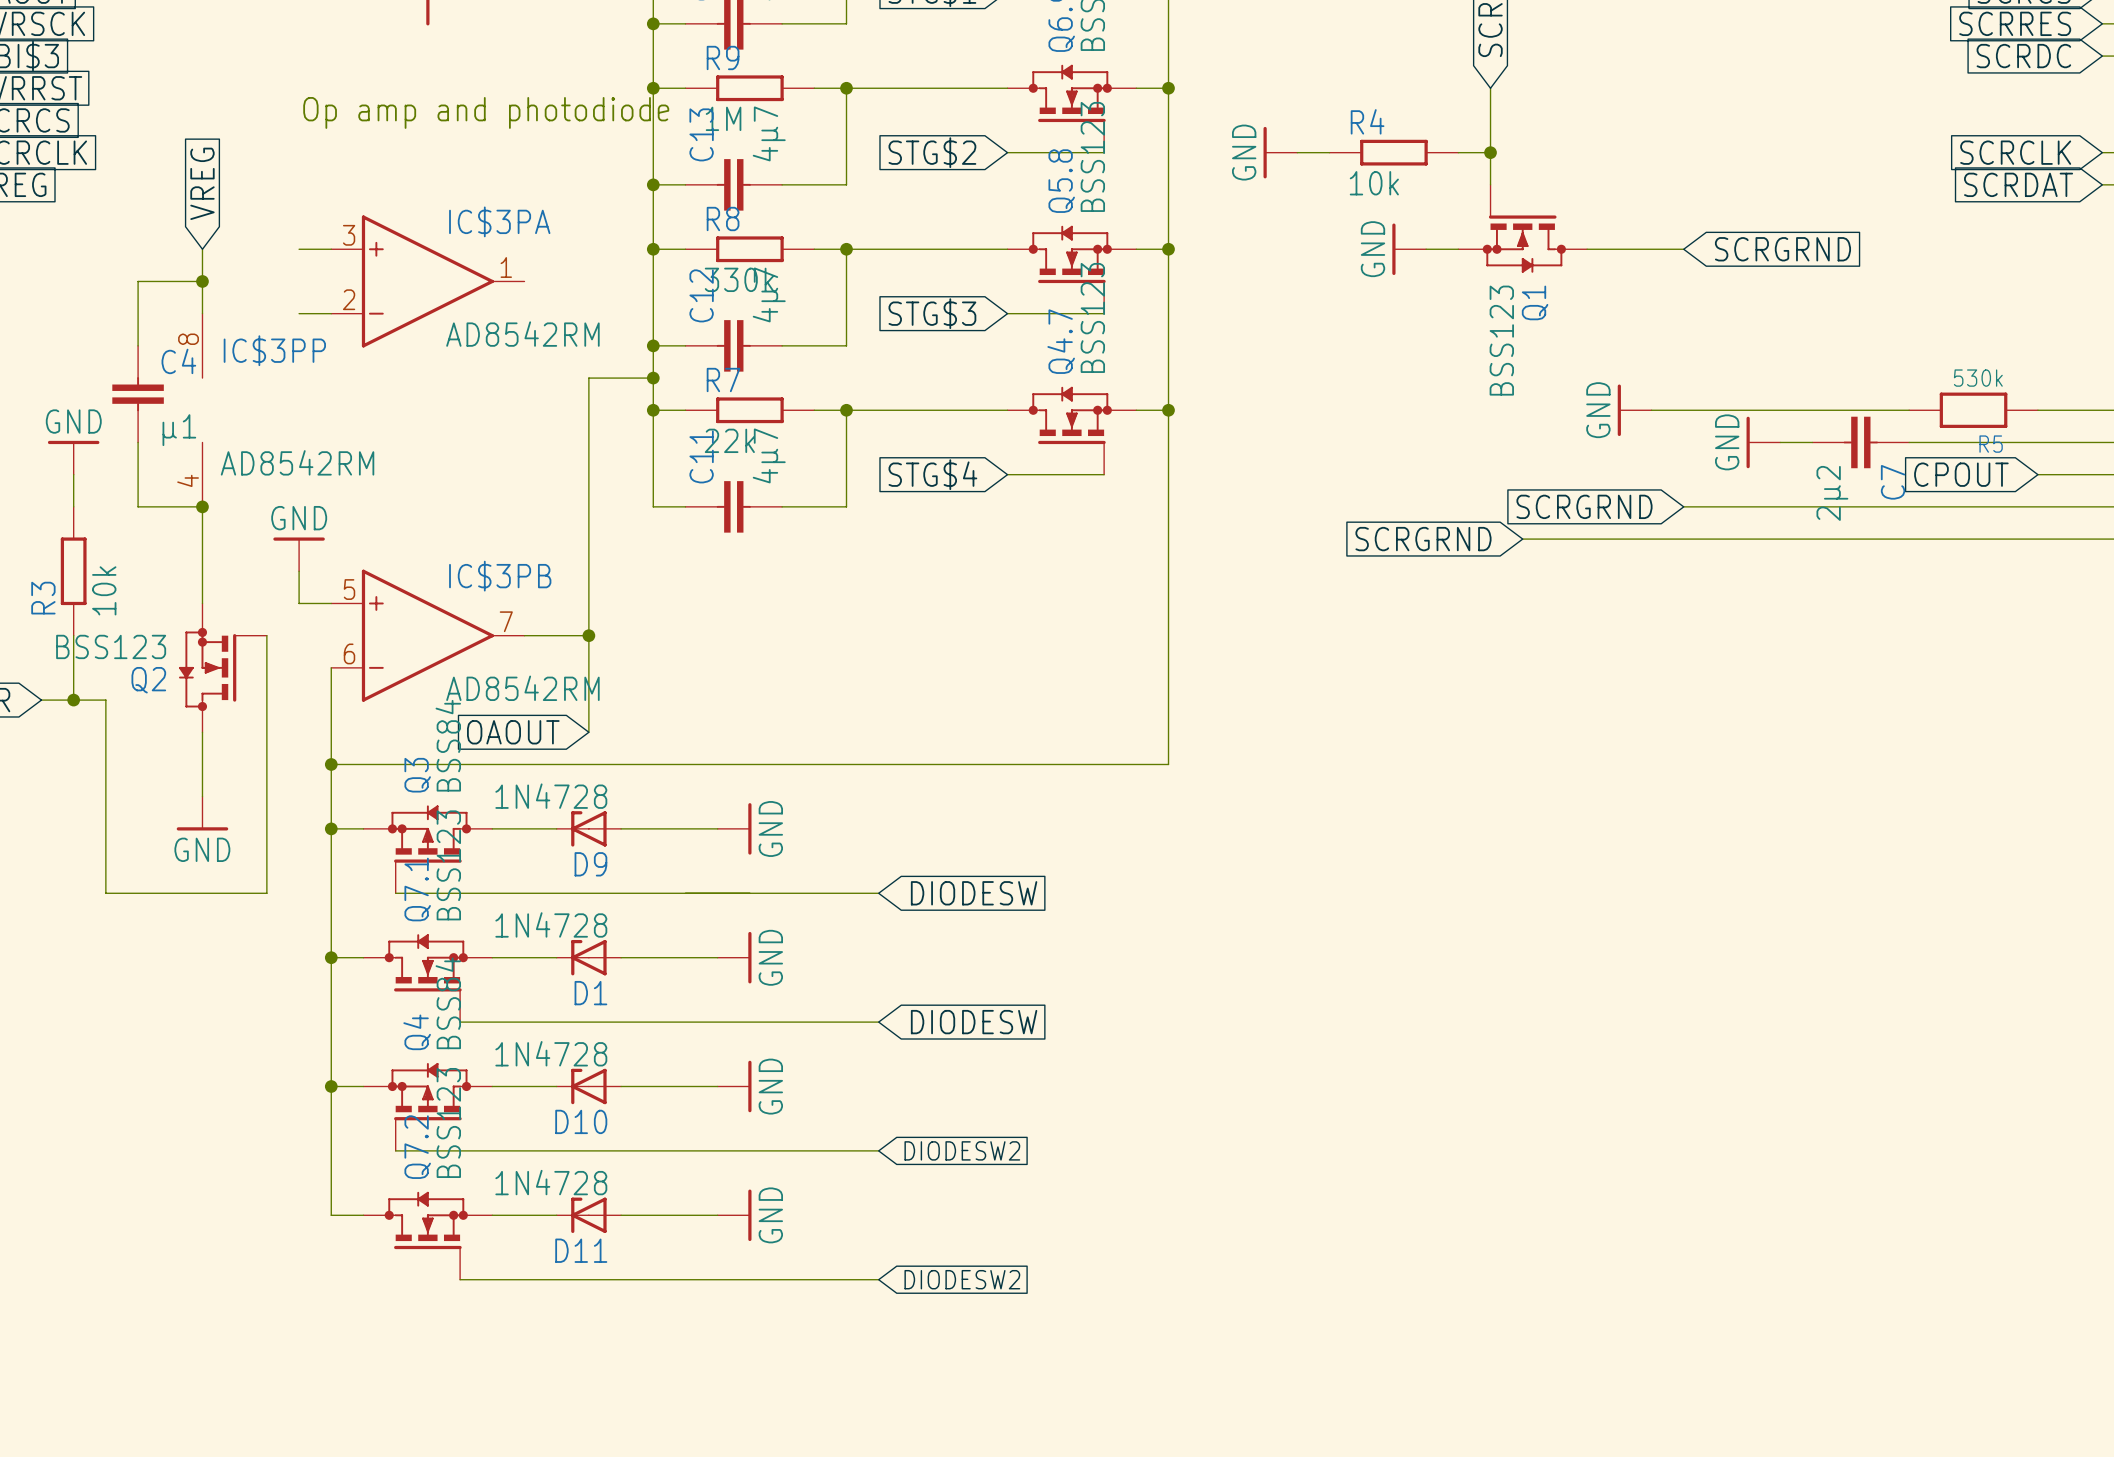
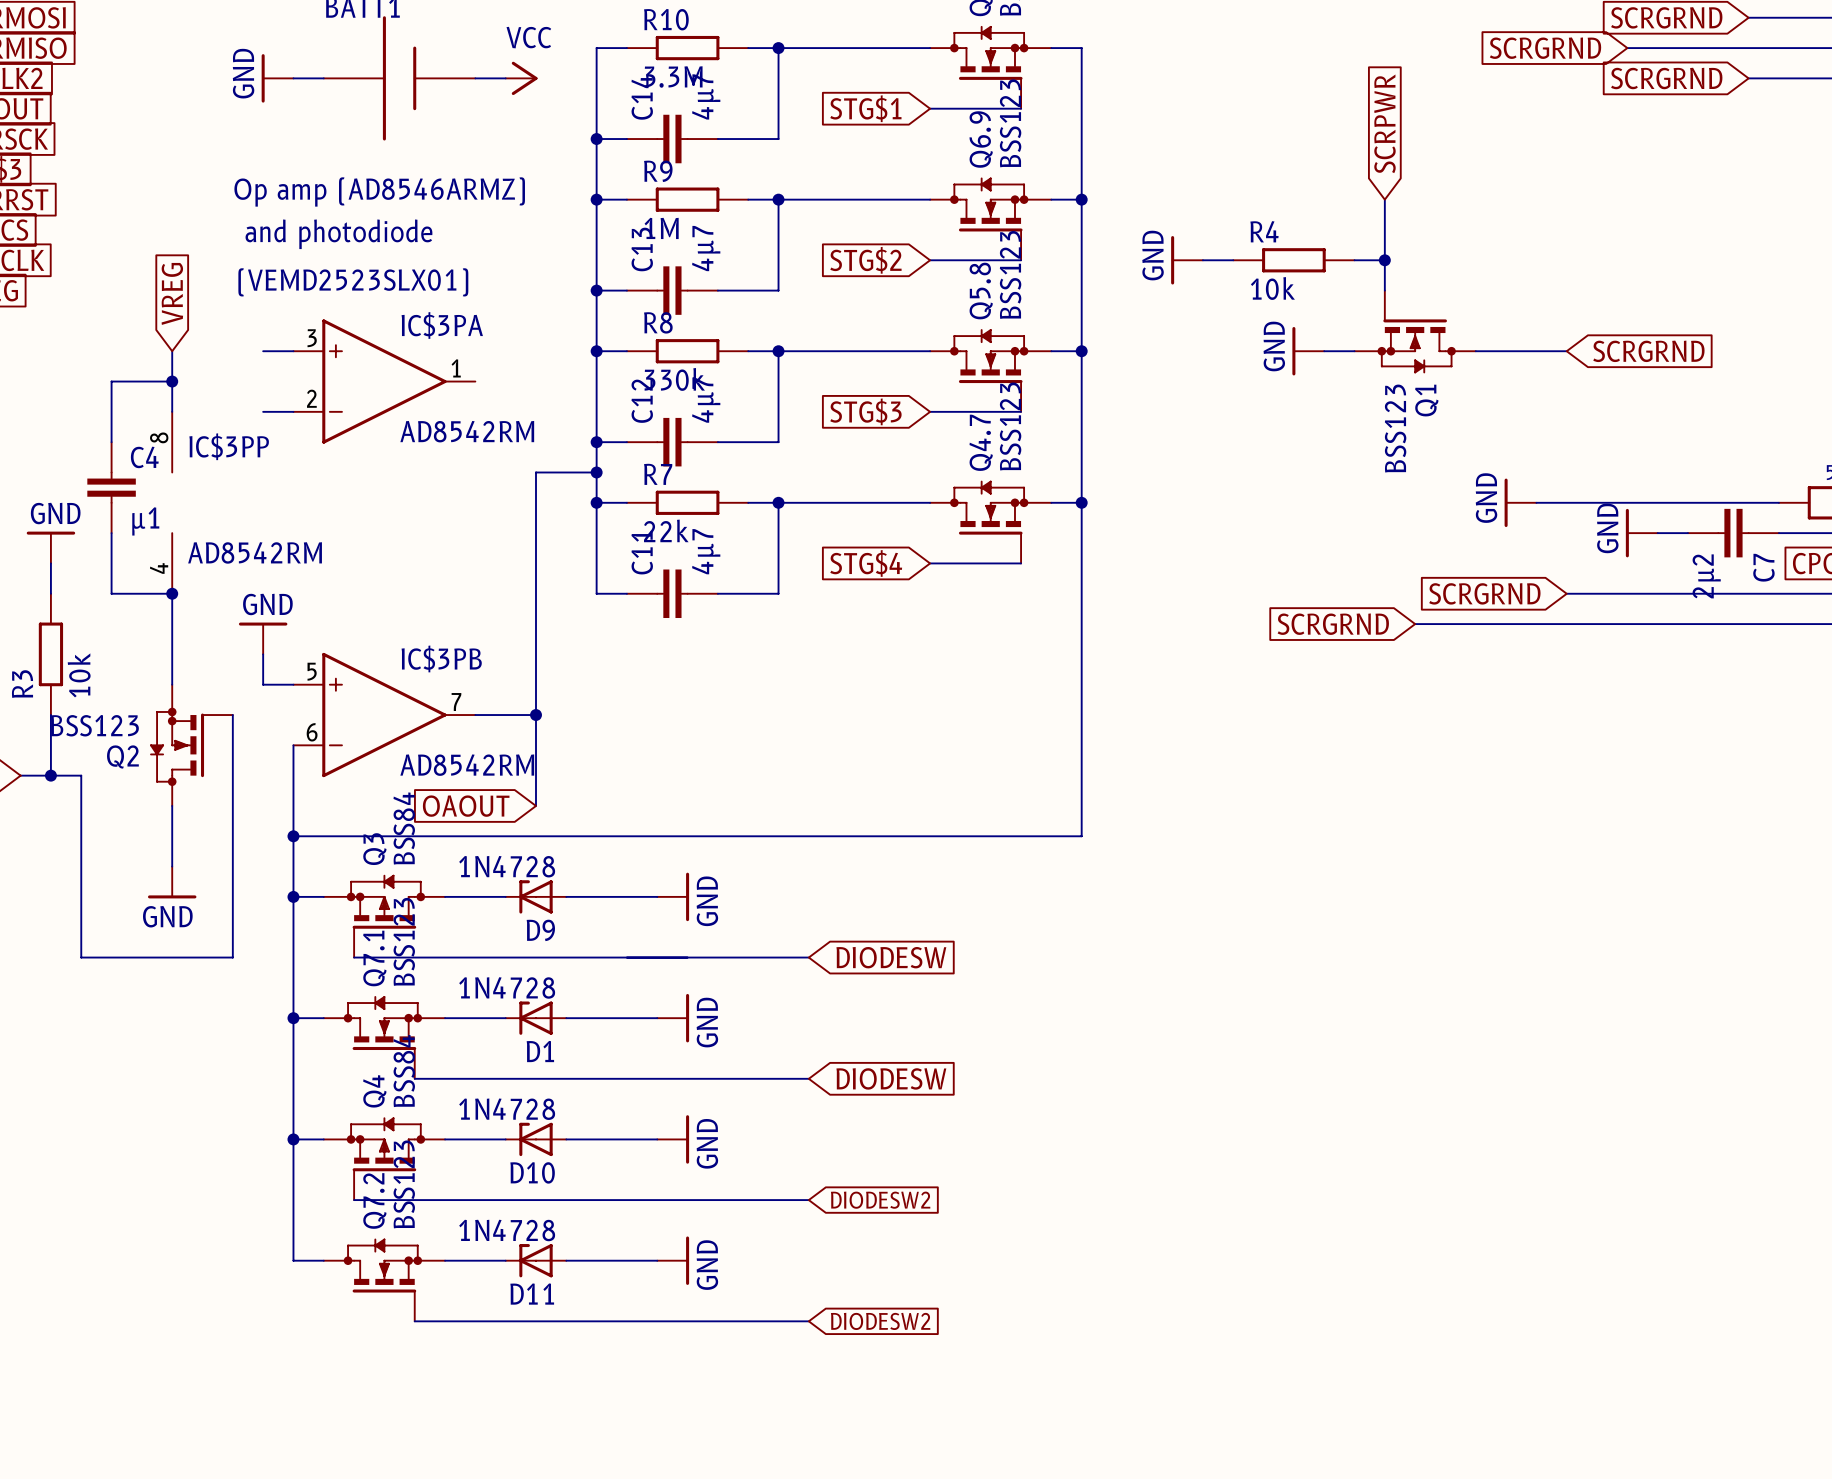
text: none -> Op amp (AD8546ARMZ) (379, 191)
text: Op amp and photodiode (486, 112) -> and photodiode (338, 234)
text: none -> (VEMD2523SLX01) (353, 282)

